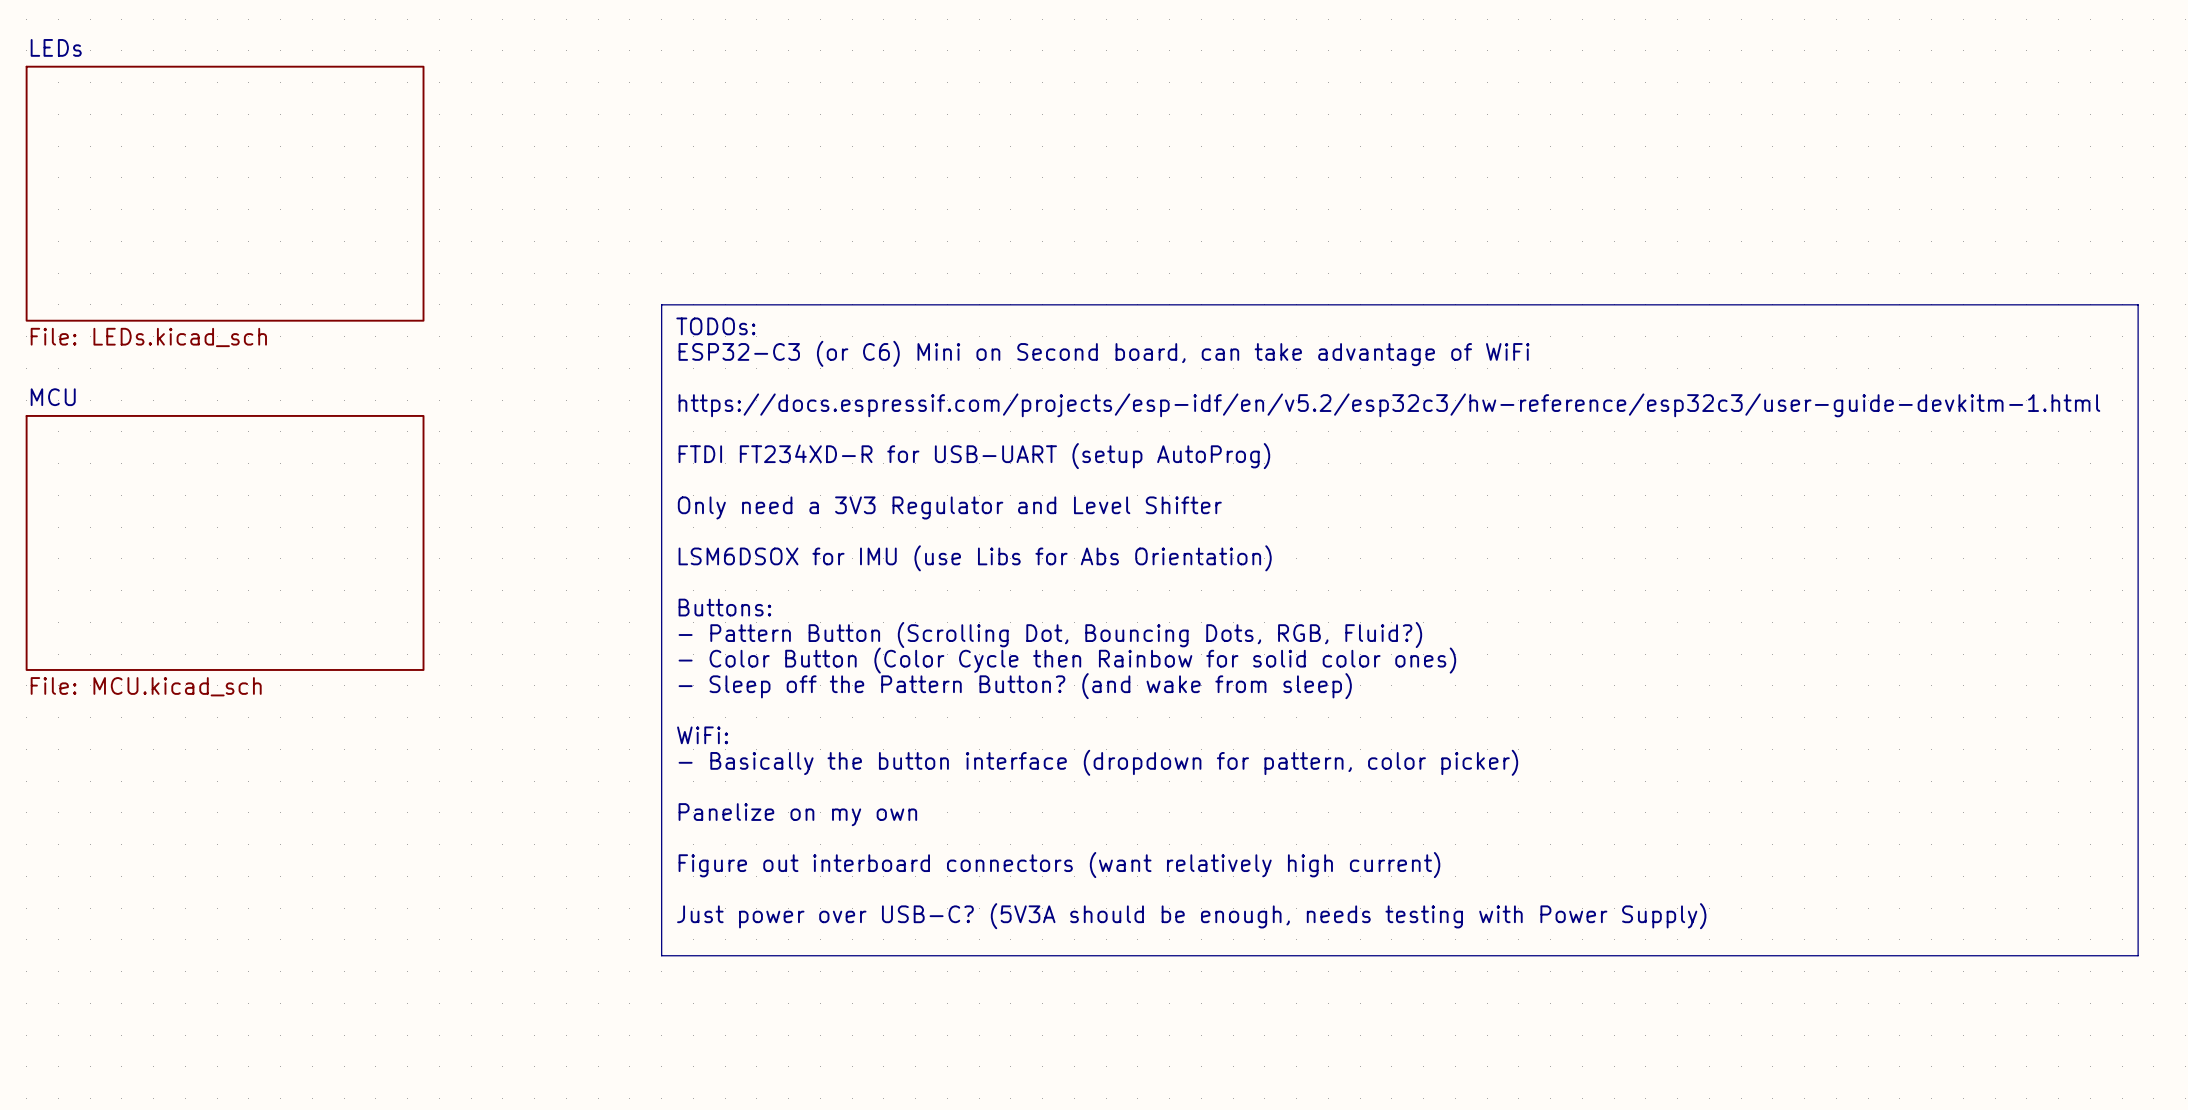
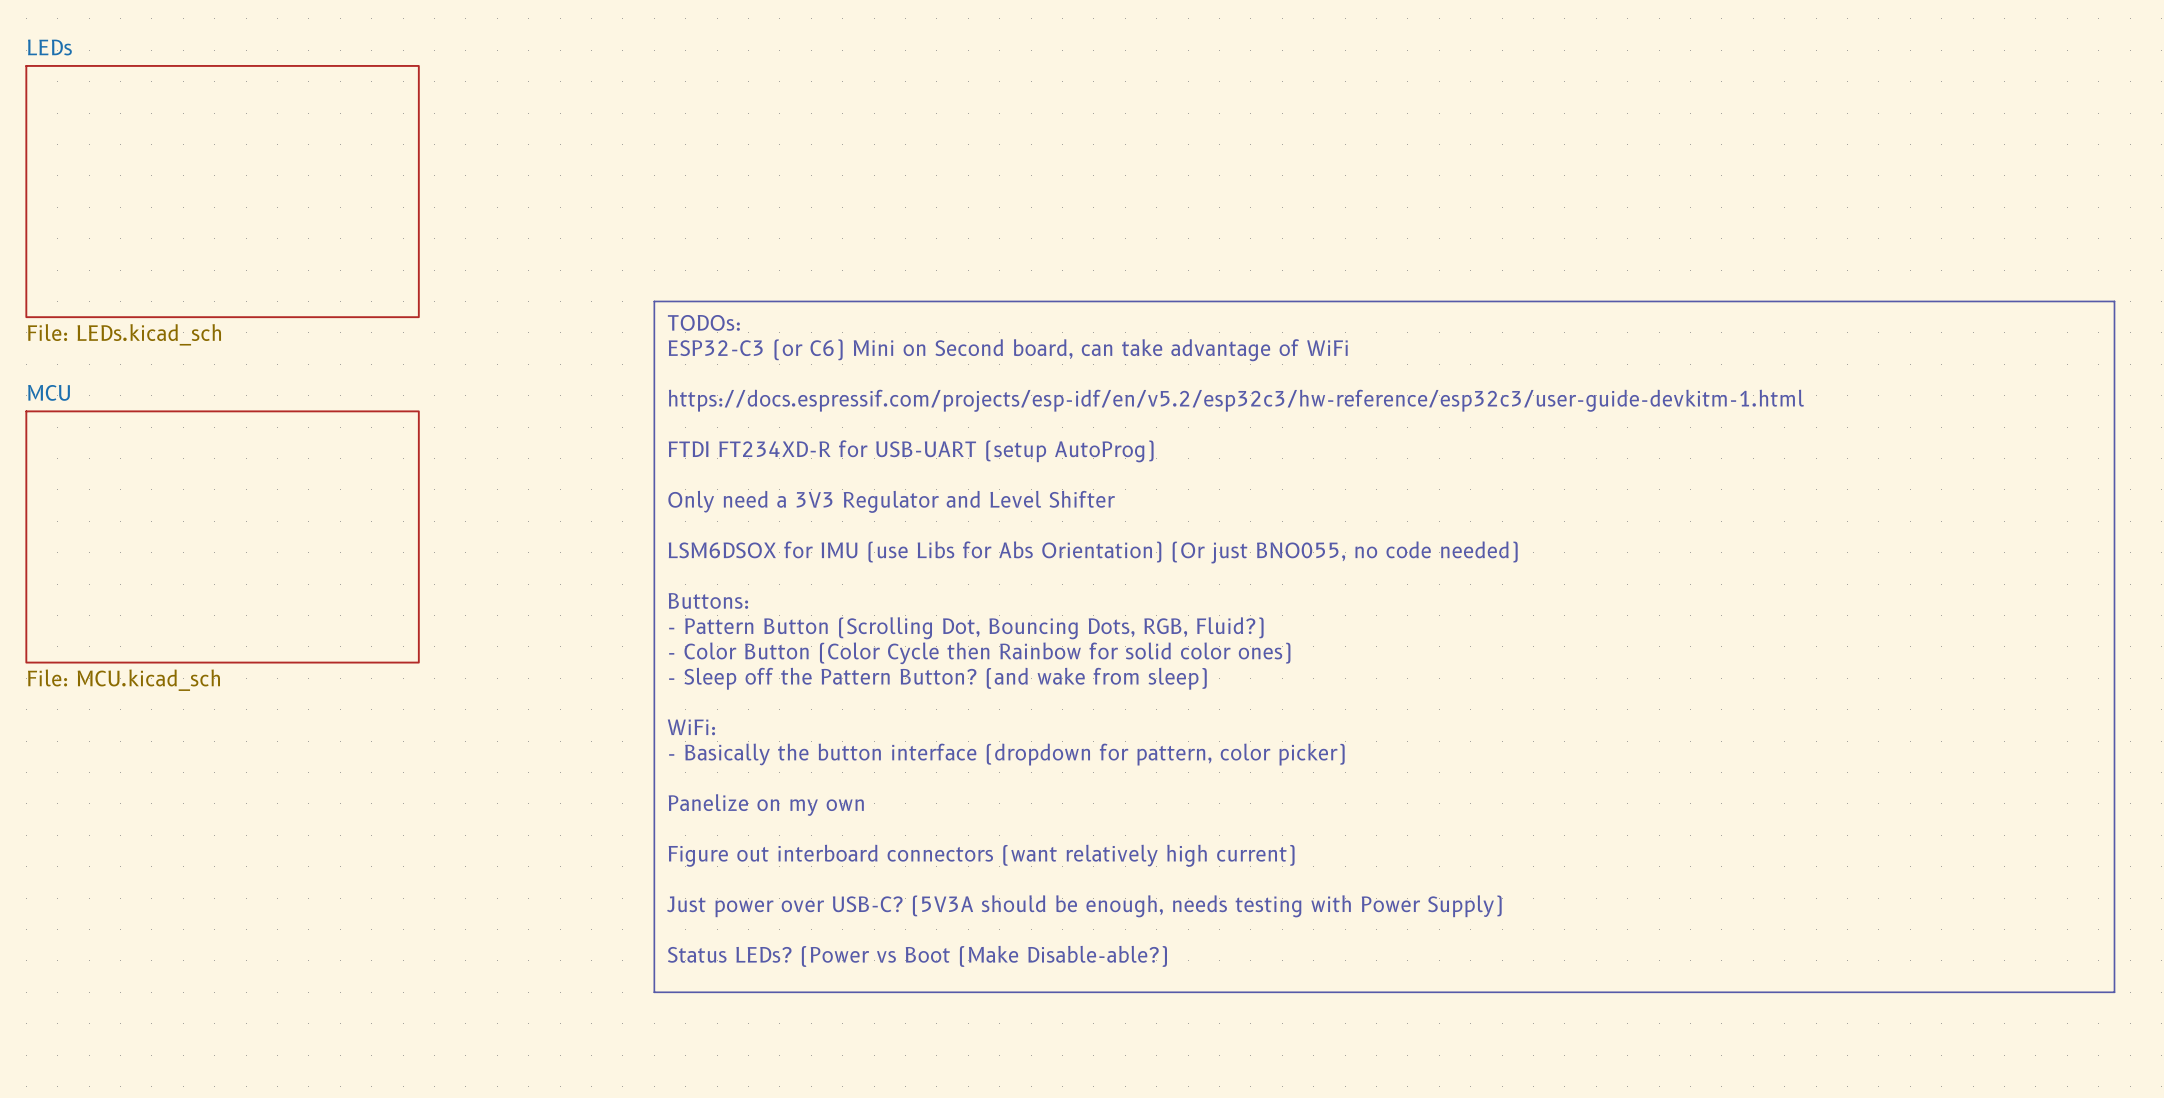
text: LSM6DSOX for IMU (use Libs for Abs Orientation) (975, 558) -> LSM6DSOX for IMU (use Libs for Abs Orientation) (Or just BNO055, no code needed) (1093, 552)
line: (661, 955) (2138, 955) -> (654, 945) (654, 992) (2114, 992) (2114, 945)
text: none -> Status LEDs? (Power vs Boot (Make Disable-able?) (917, 956)

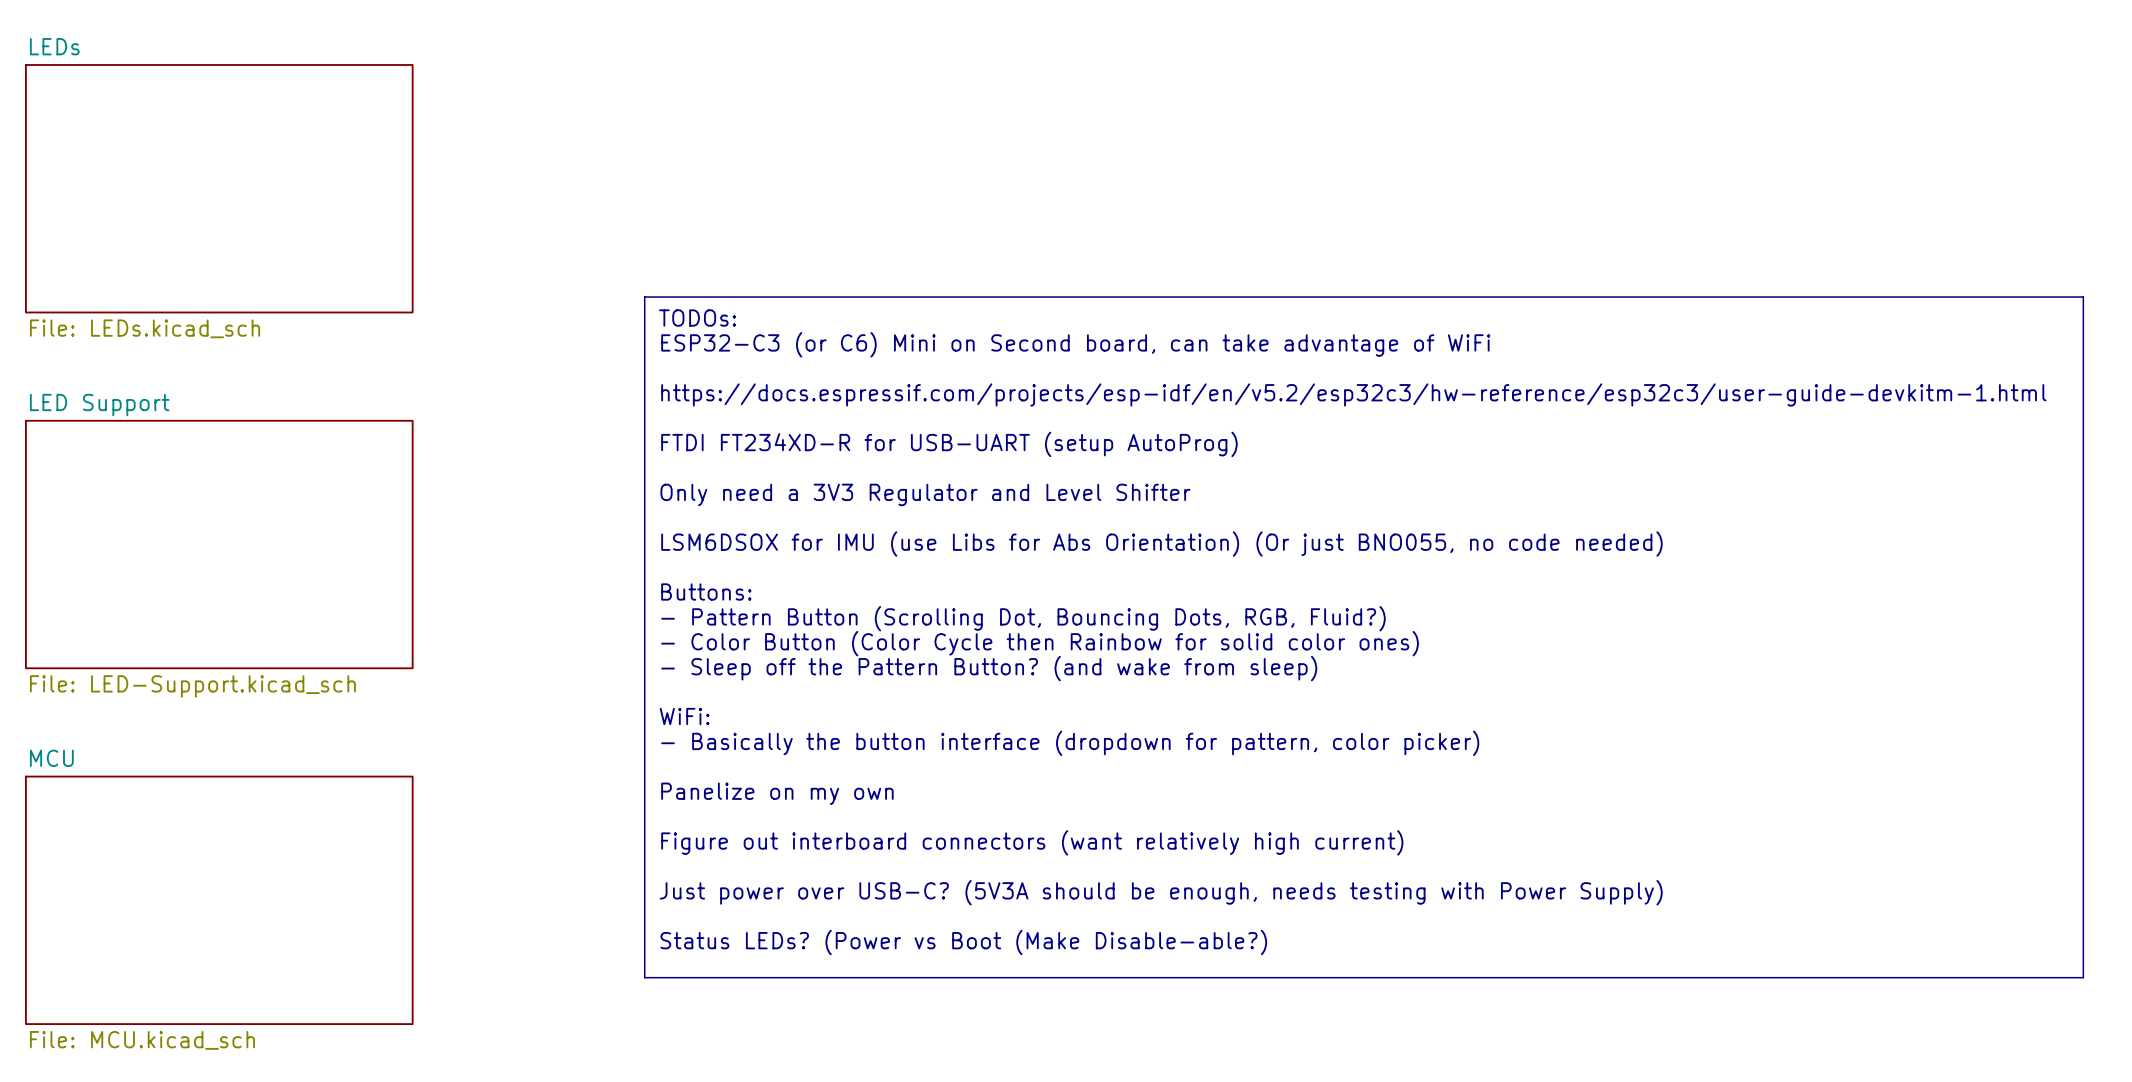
sheet MCU: File: MCU.kicad_sch (222, 536) -> none
sheet LED Support: none -> File: LED-Support.kicad_sch (219, 544)
sheet MCU: none -> File: MCU.kicad_sch (219, 900)

